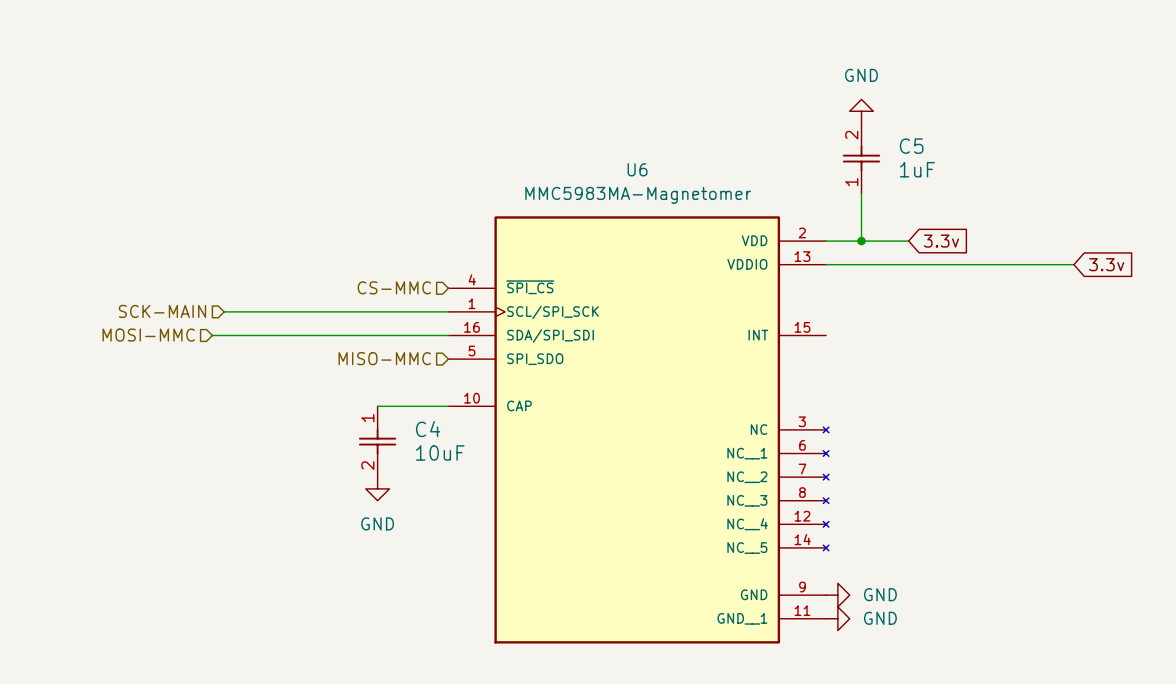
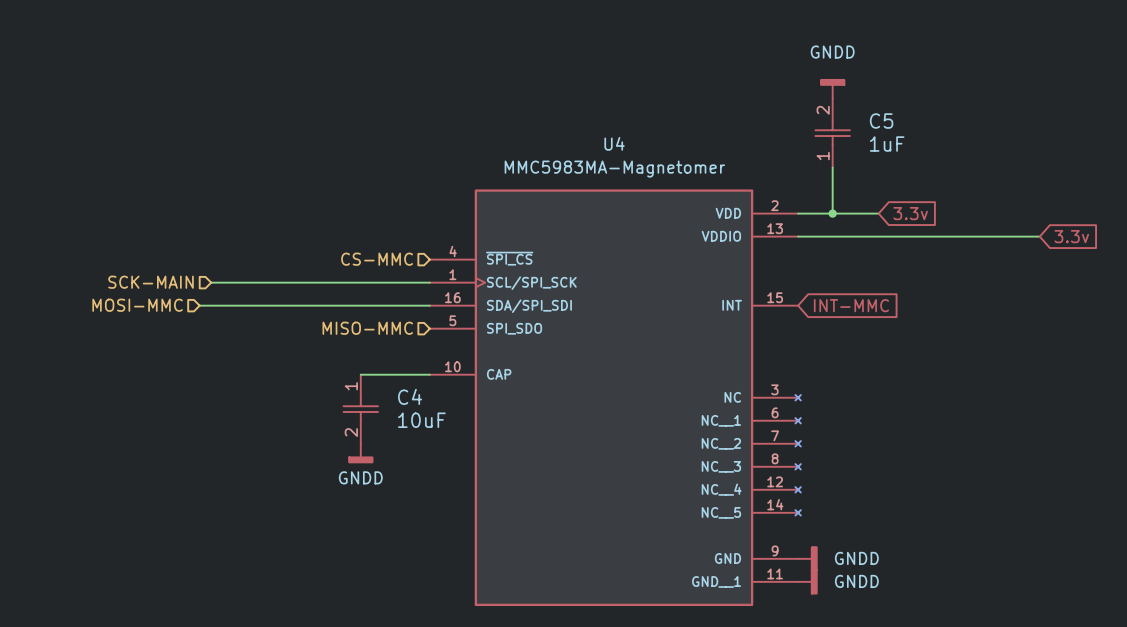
power symbol: GND (861, 111) -> GNDD (832, 88)
U6 name: U6 (637, 169) -> U4 (614, 143)
global label: none -> INT-MMC (851, 305)
power symbol: GND (377, 488) -> GNDD (360, 453)
power symbol: GND (837, 595) -> GNDD (807, 558)
power symbol: GND (837, 618) -> GNDD (807, 581)

